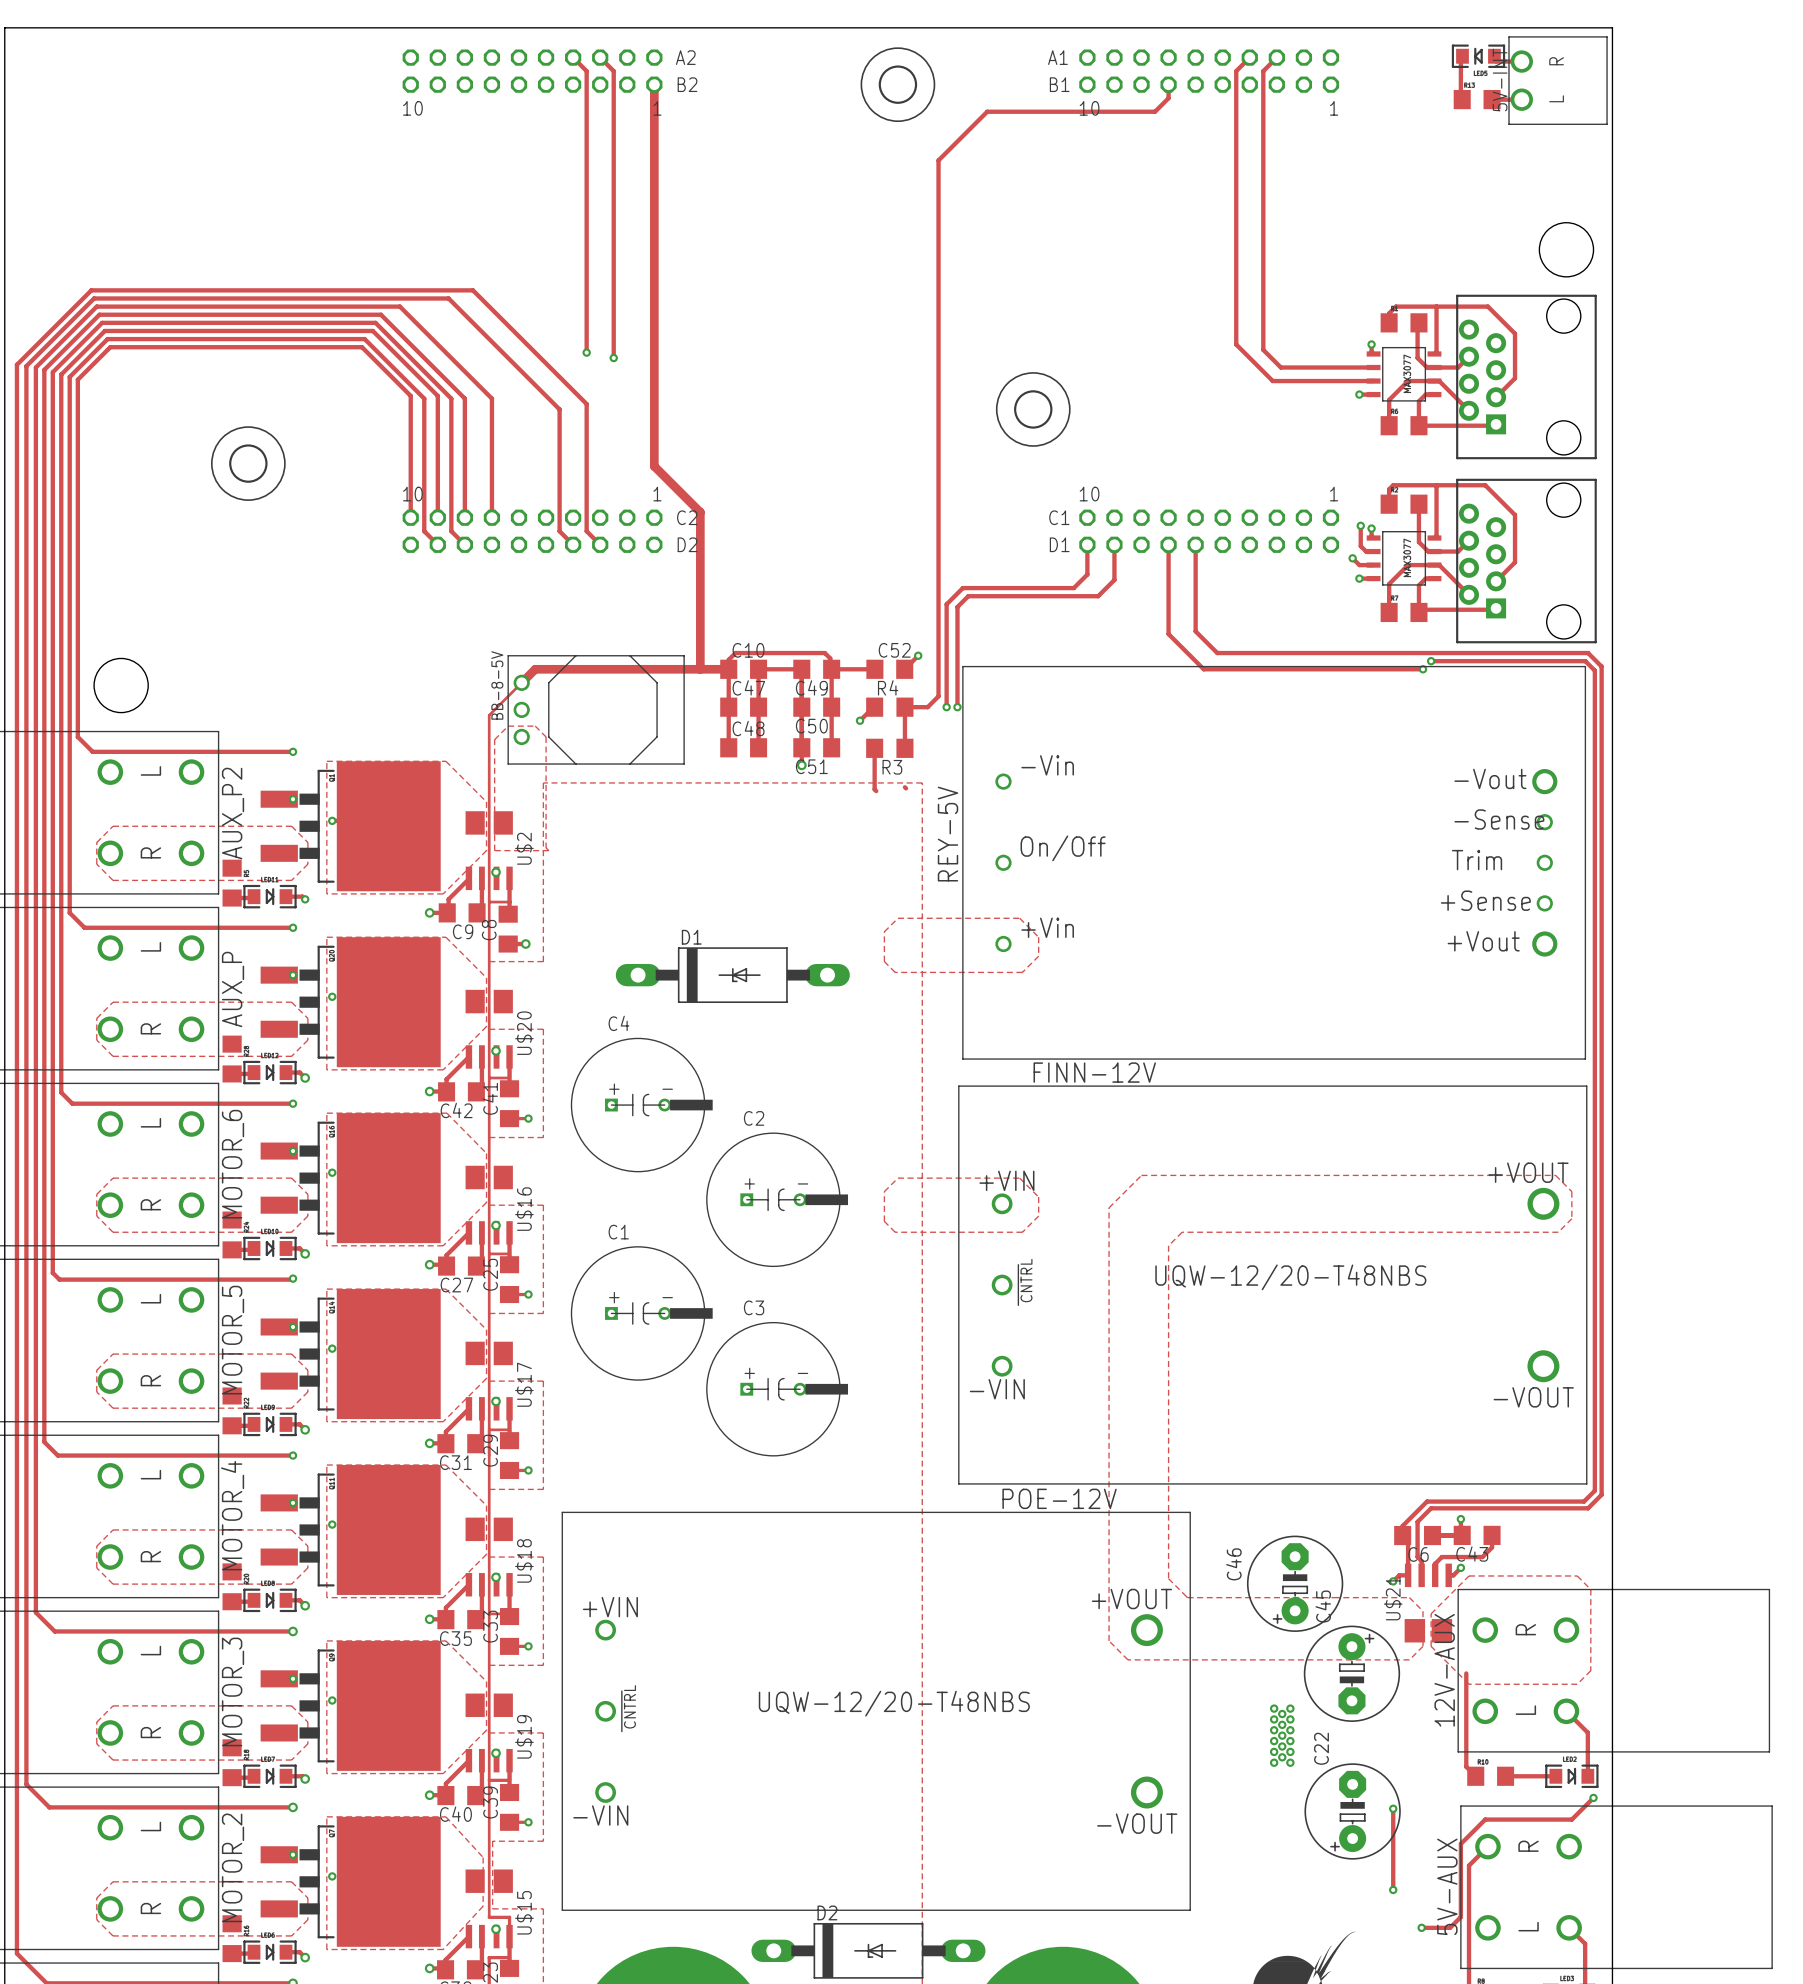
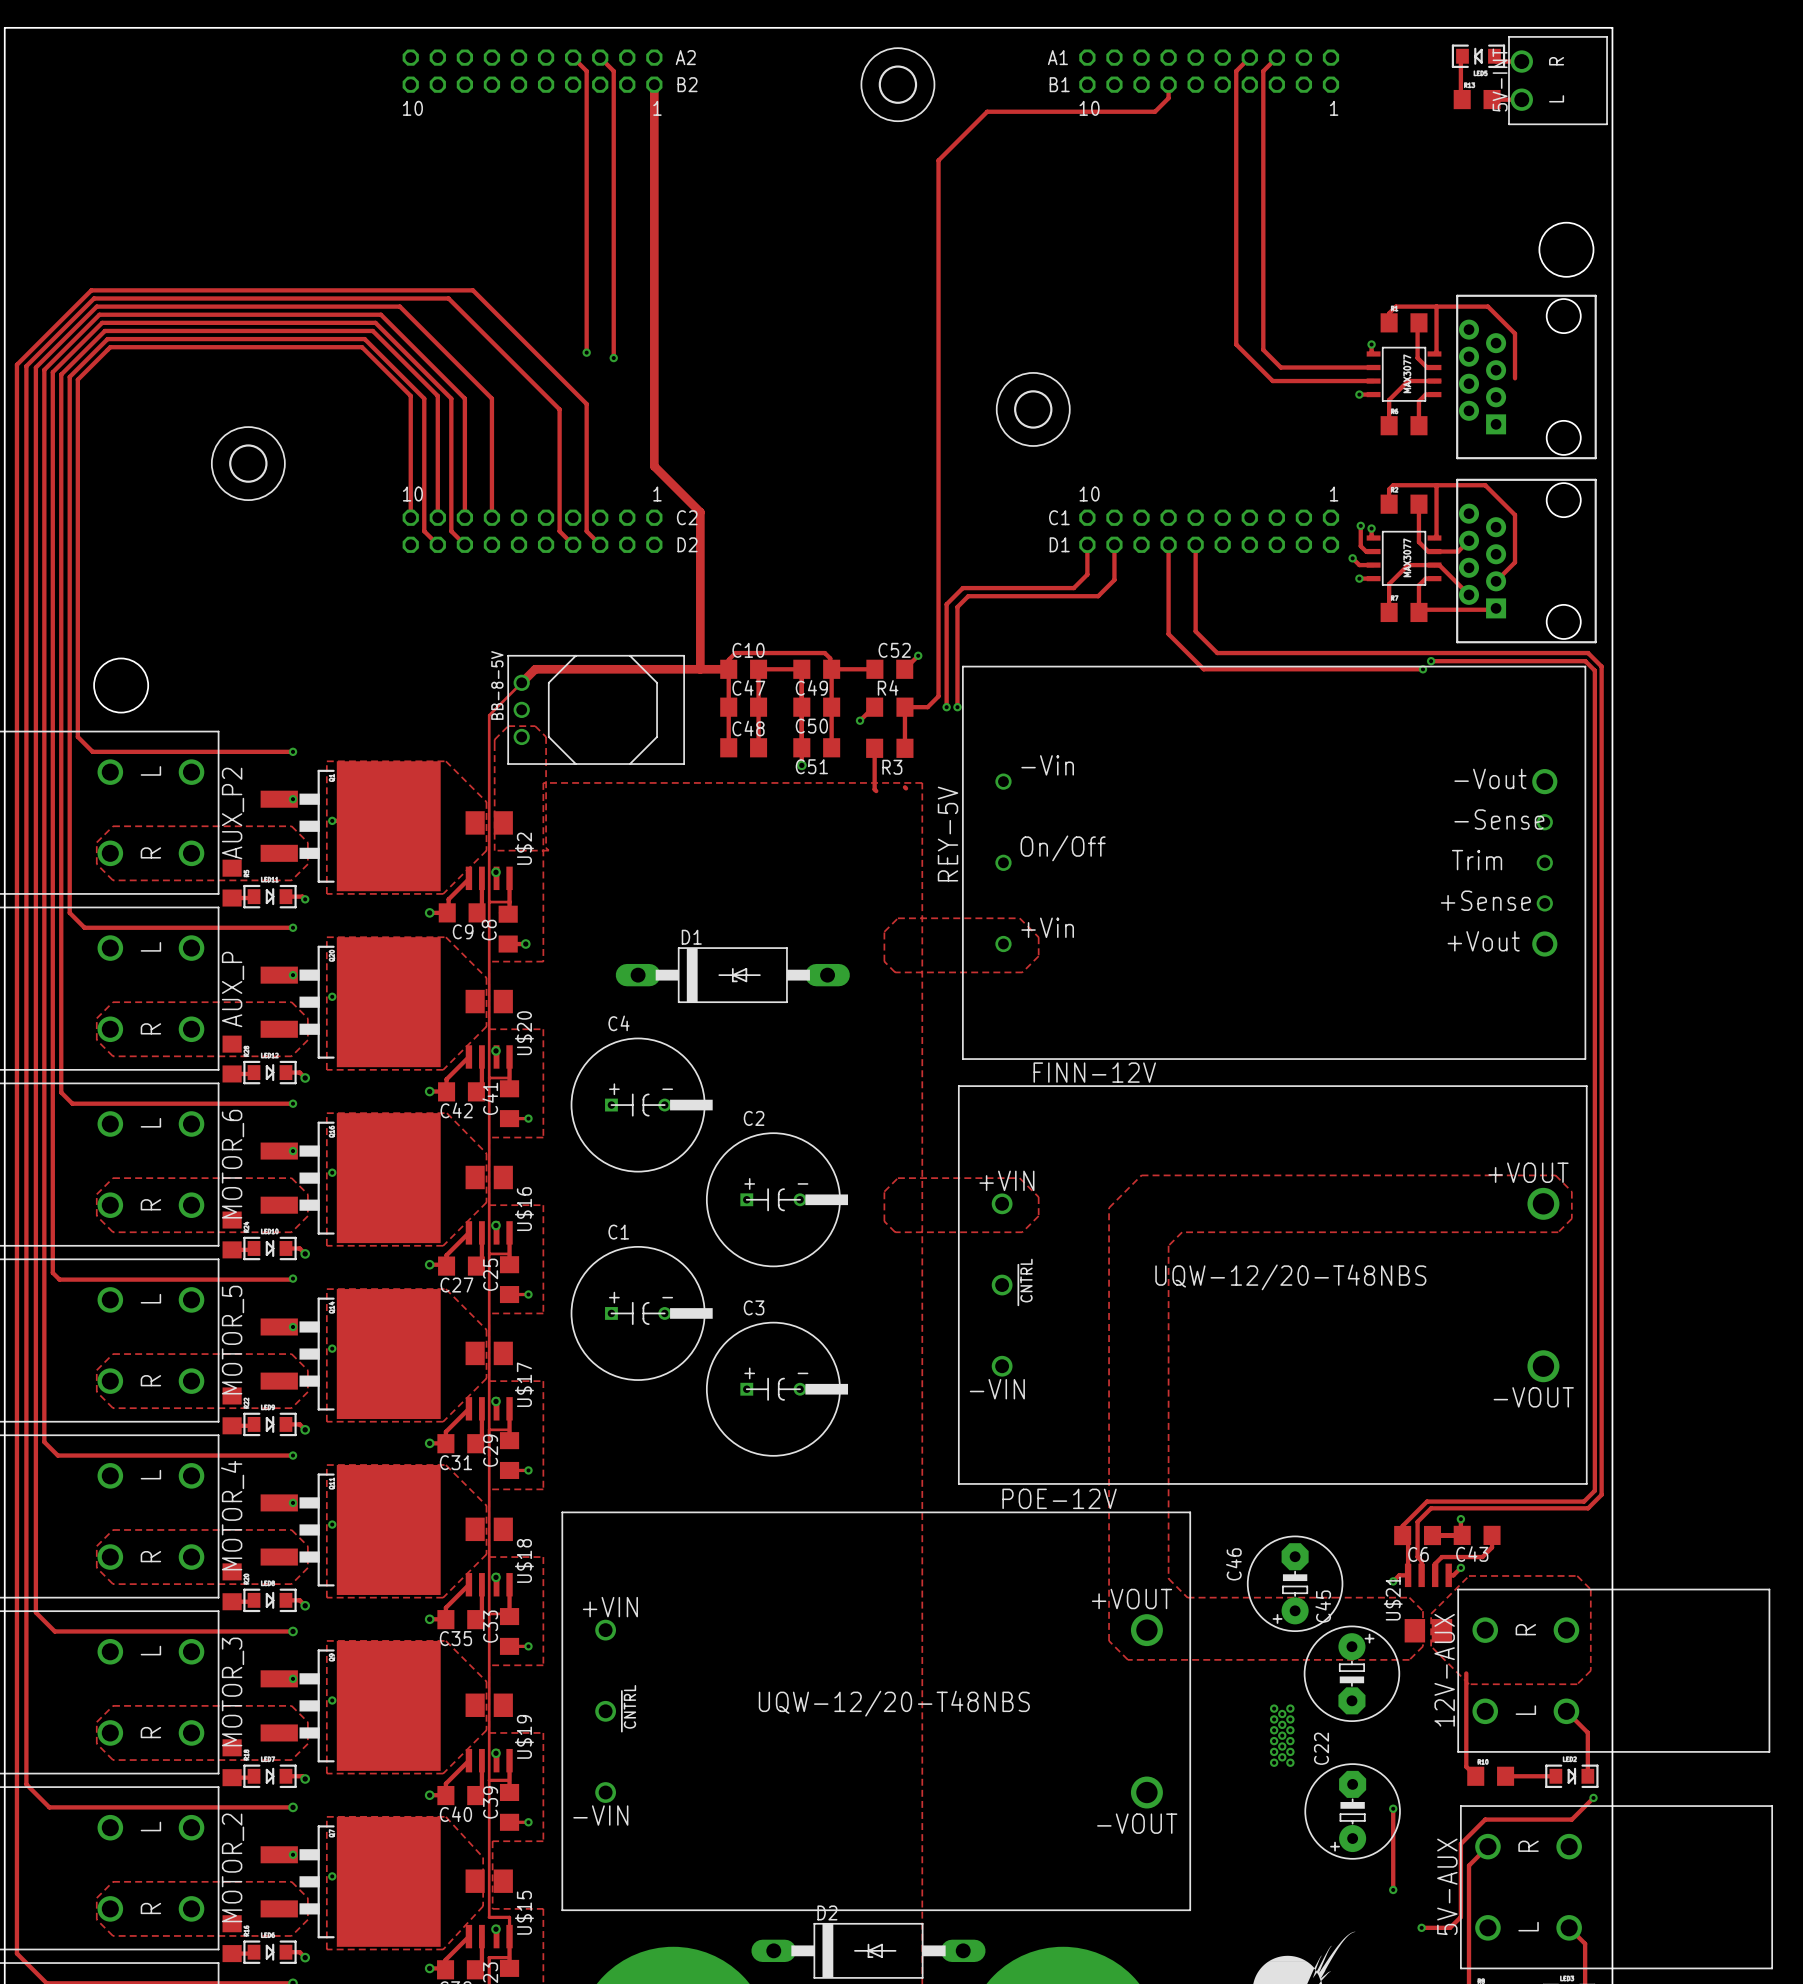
track: (1469, 356) (1458, 367) (1434, 367) -> none
track: (1515, 378) (1496, 397) -> none
track: (1439, 381) (1469, 410) -> none
track: (1496, 424) (1418, 425) -> none

